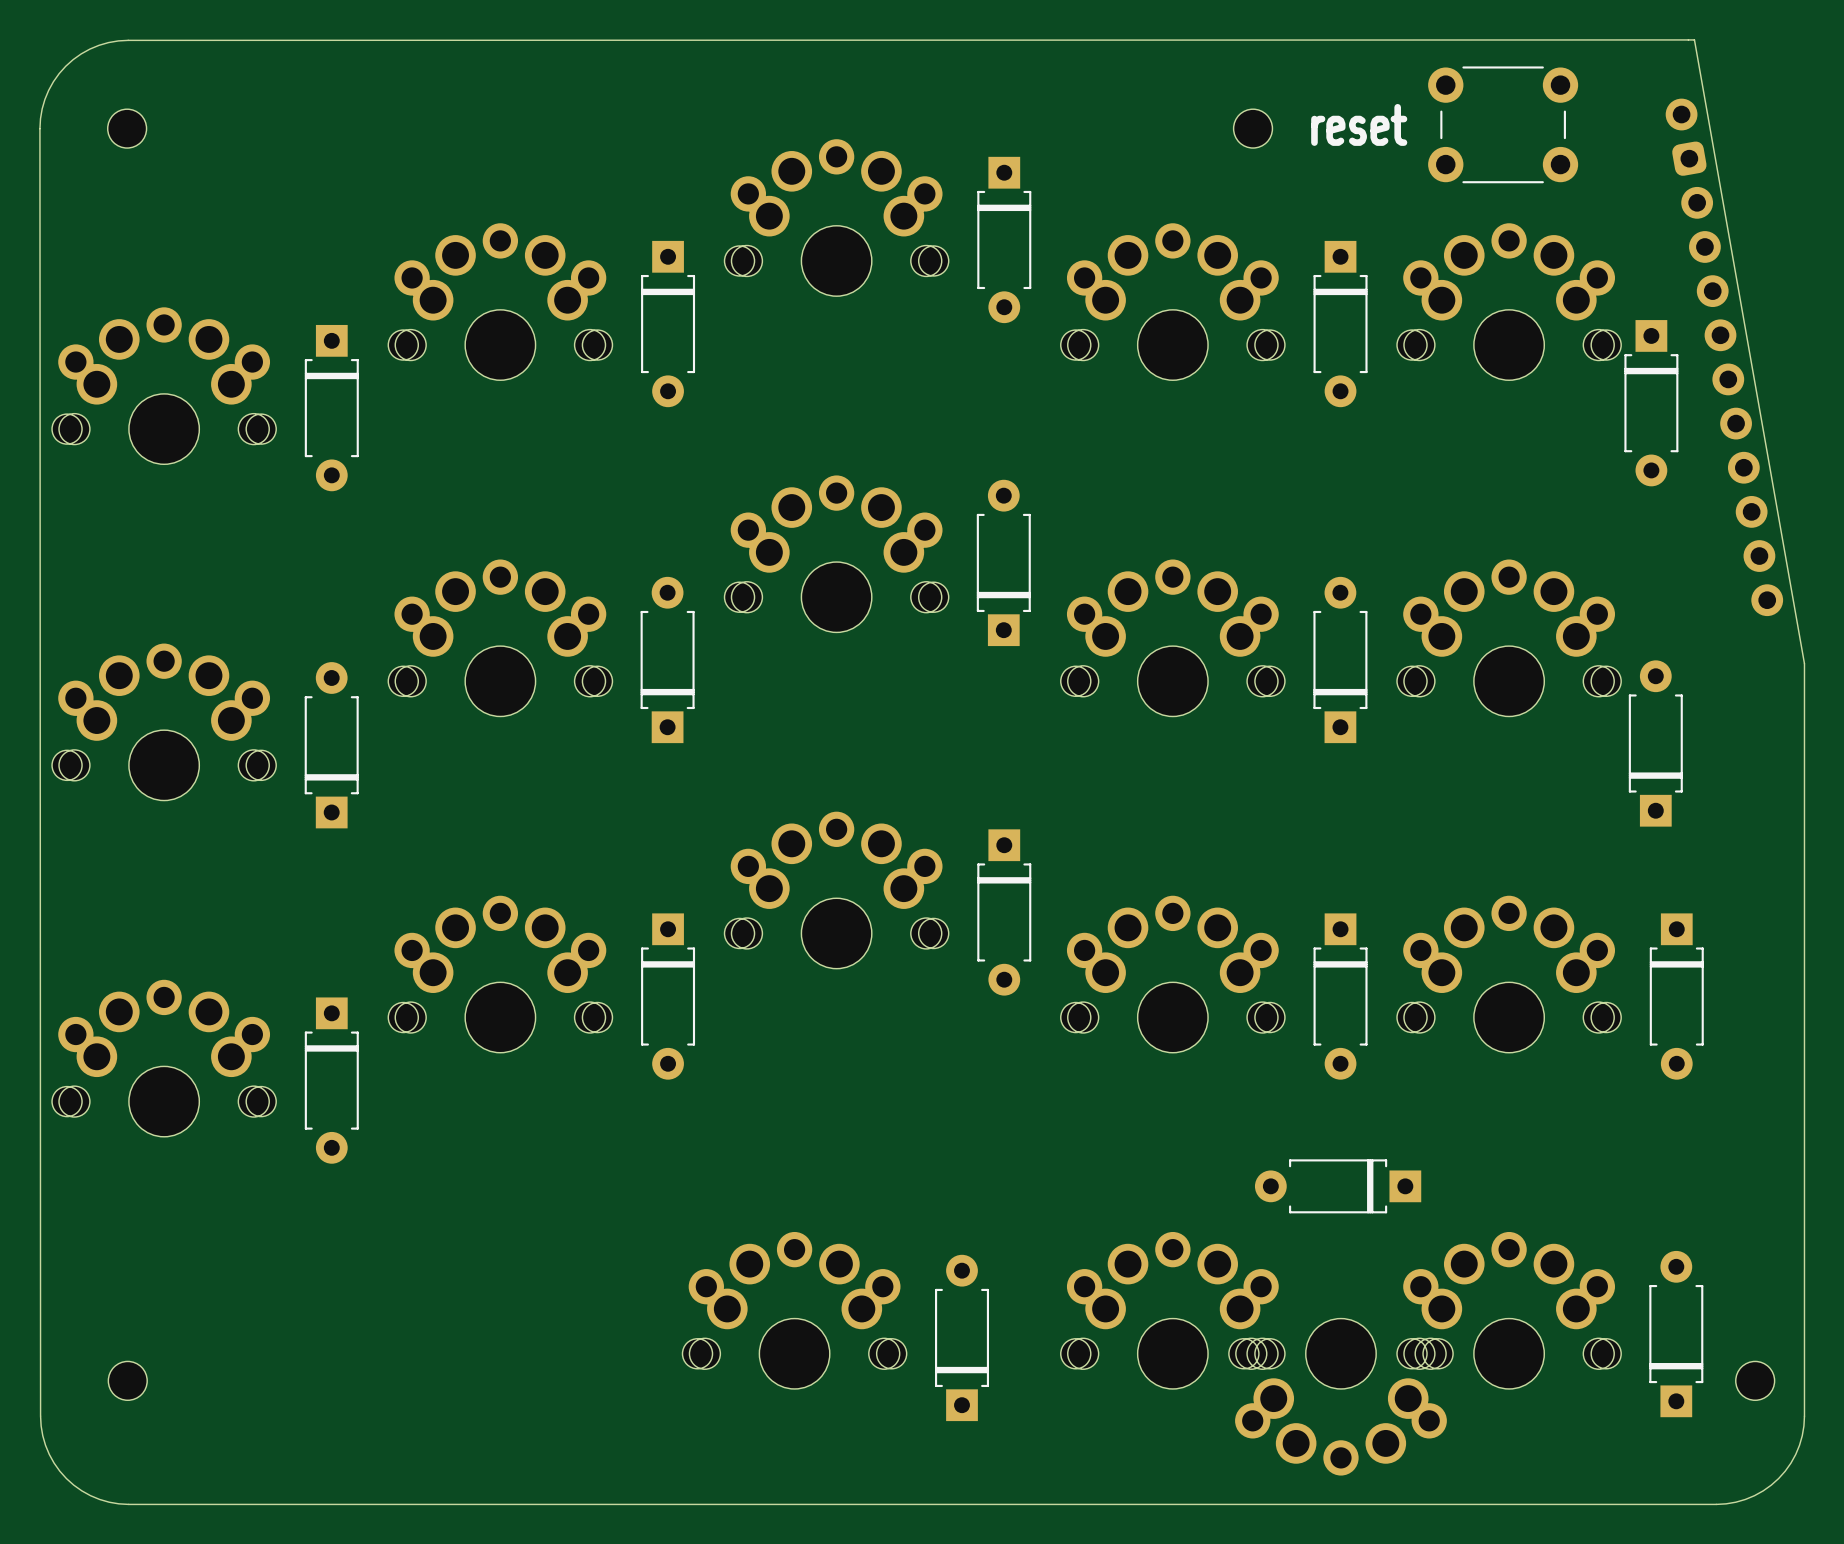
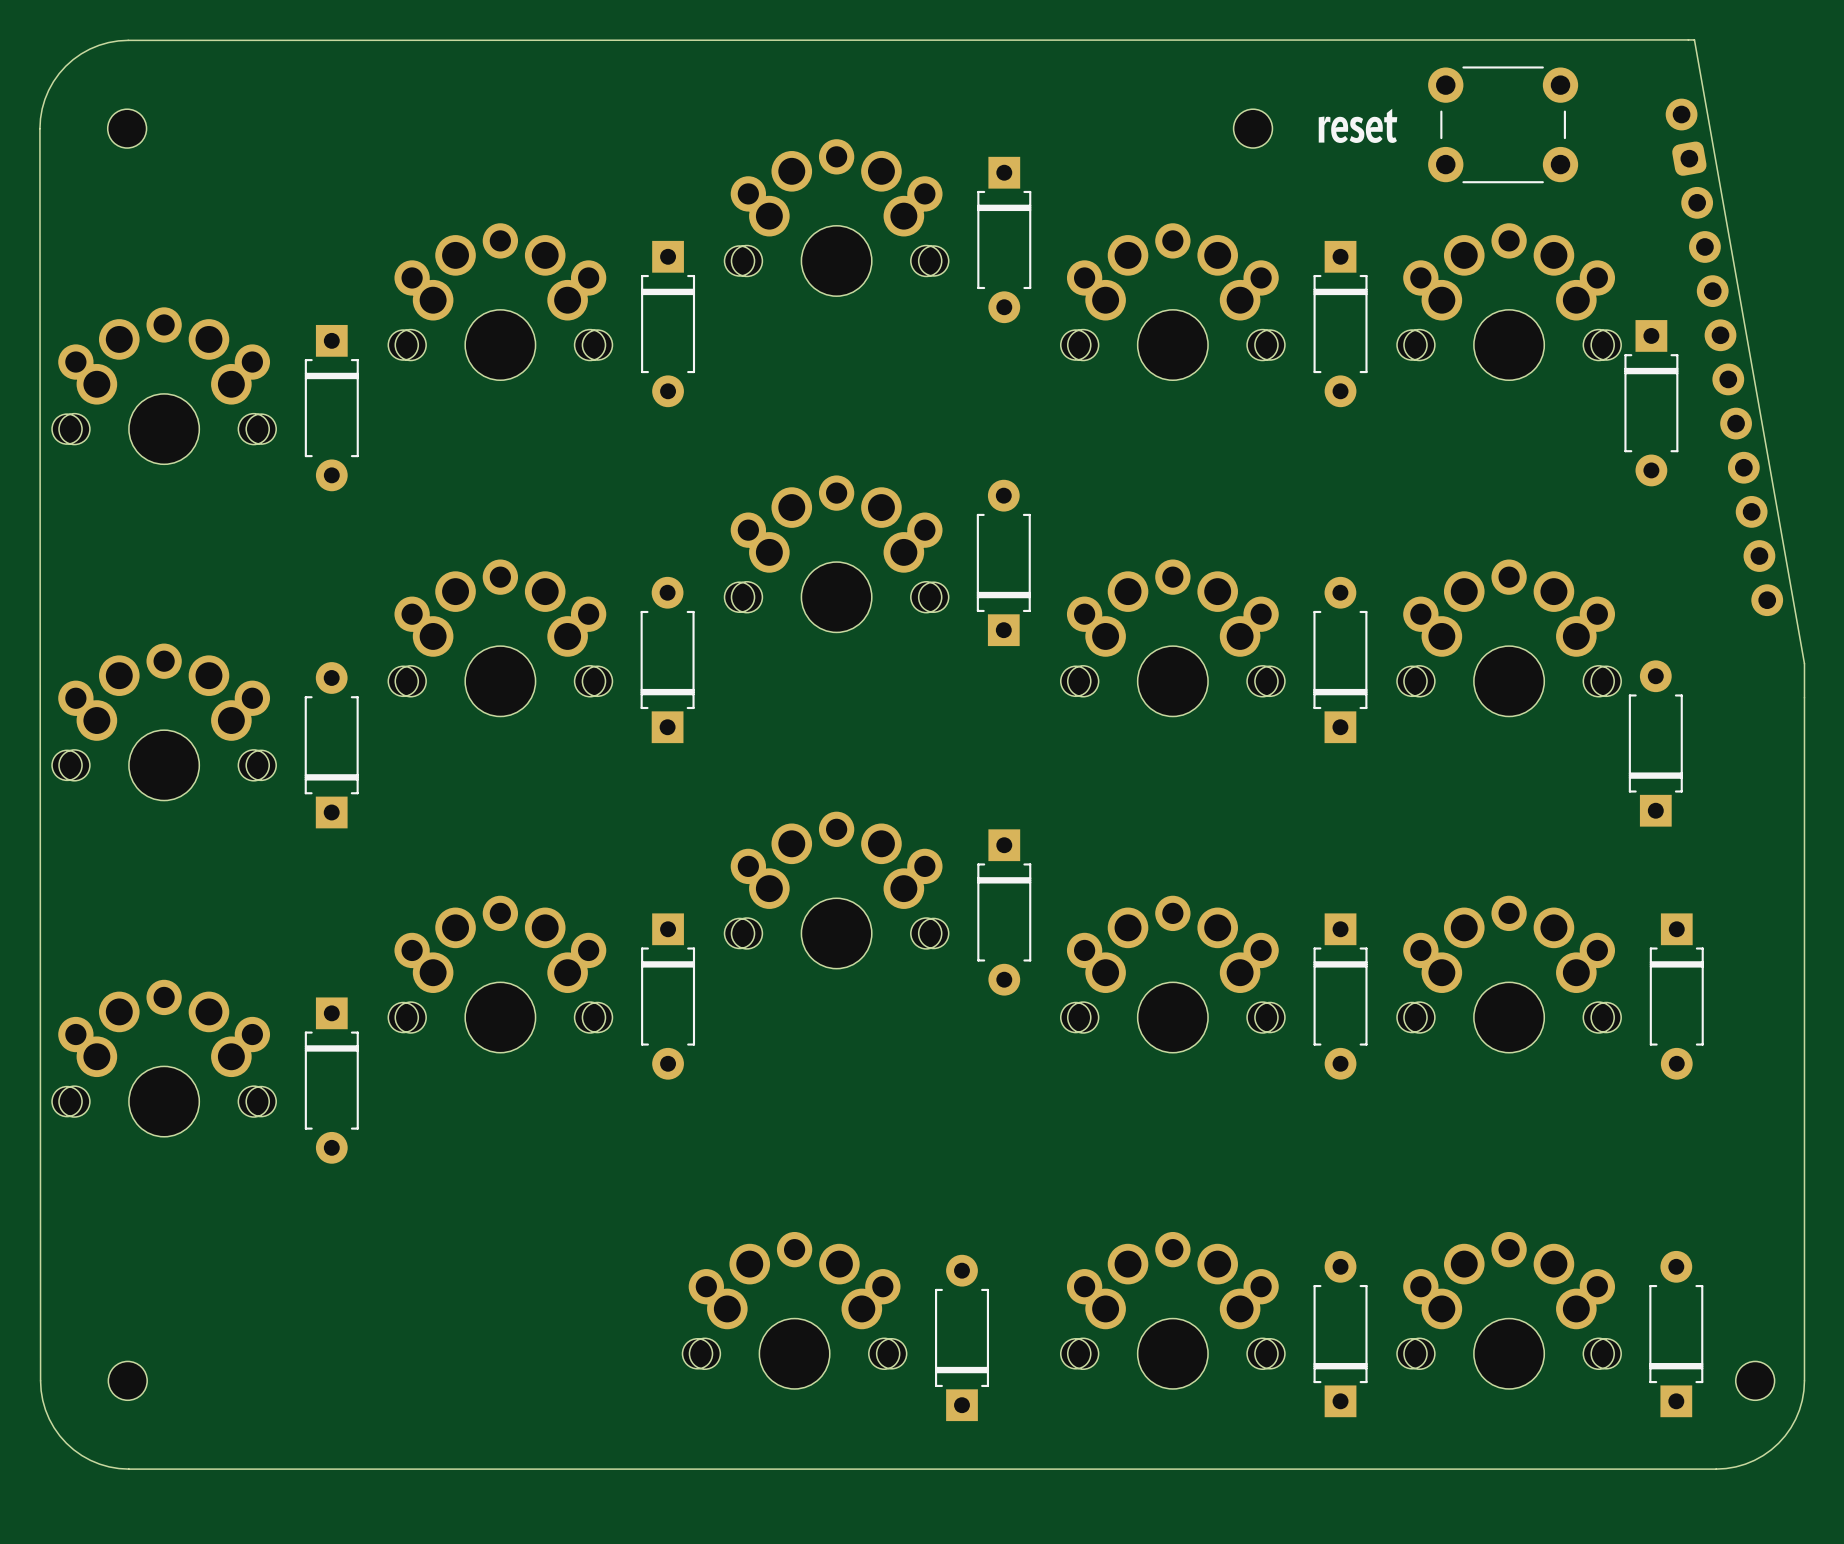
board edge: (39, 128) (40, 1415) -> none
part rotation: 0° (1338, 1186) -> 90° clockwise (1340, 1334)
part position: (1338, 1186) -> (1340, 1334)
board edge: (1804, 1380) (1802, 1435) (1795, 1454) (1785, 1471) (1771, 1485) (1754, 1495) (1735, 1502) (1716, 1504) (128, 1504) (109, 1502) (90, 1495) (66, 1478) (54, 1463) (45, 1445) (40, 1416) -> (1804, 1380) (1802, 1400) (1795, 1419) (1778, 1443) (1754, 1460) (1735, 1466) (1716, 1469) (128, 1469) (99, 1464) (73, 1449) (59, 1435) (49, 1419) (42, 1400) (40, 1380) (39, 128)
part: (1340, 1397) -> none

